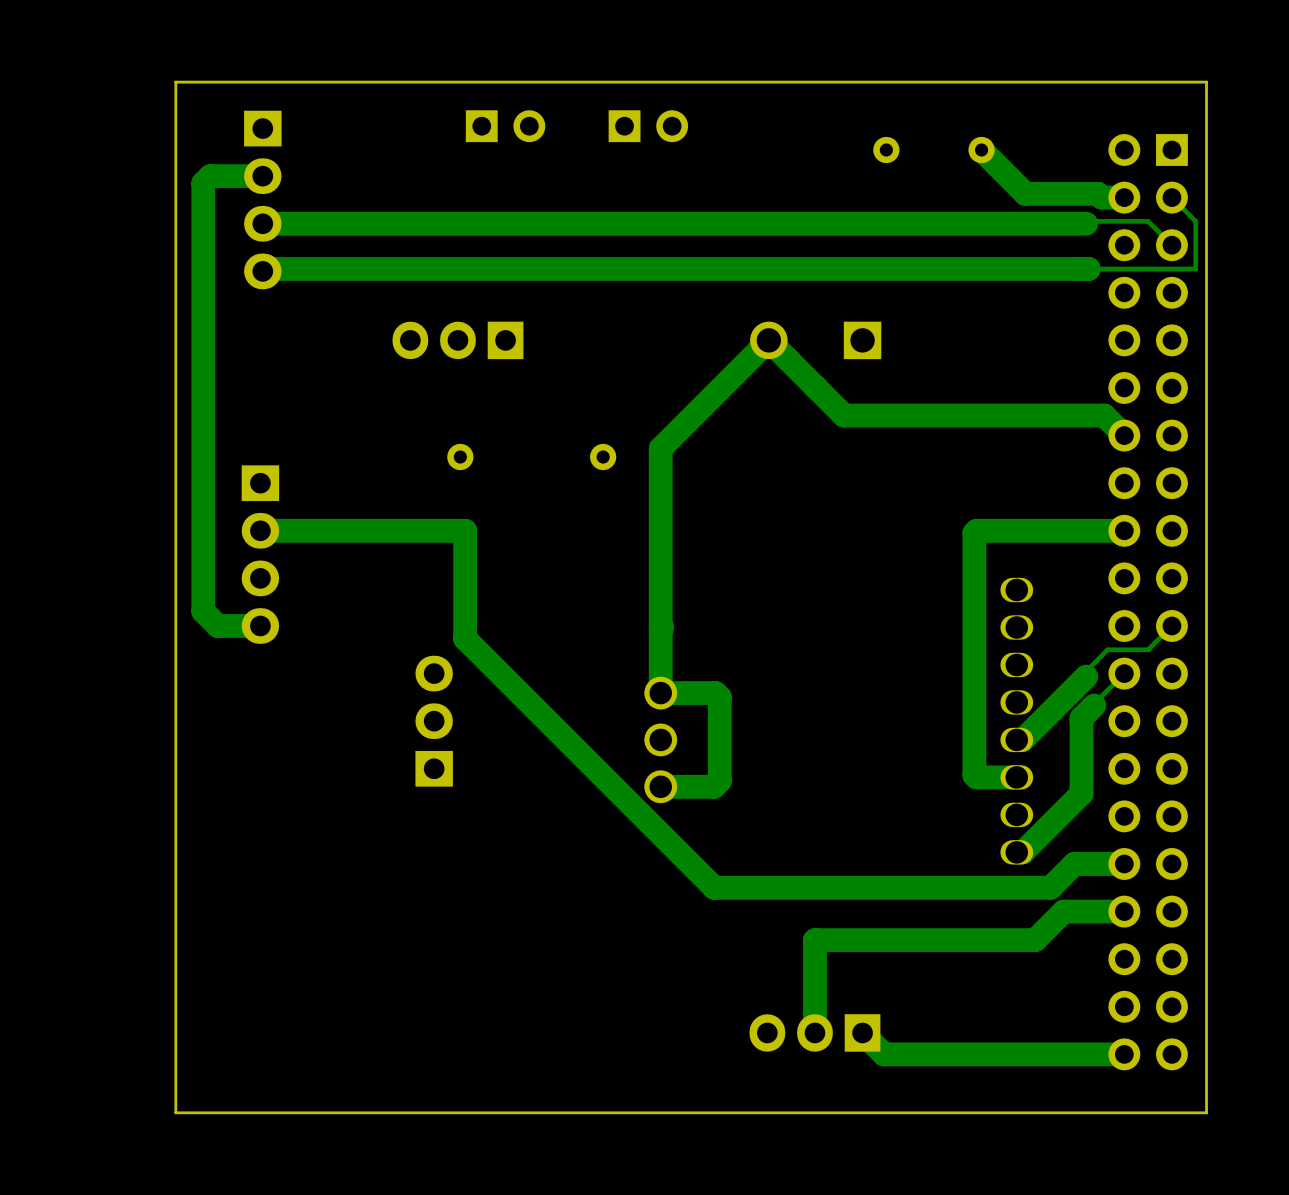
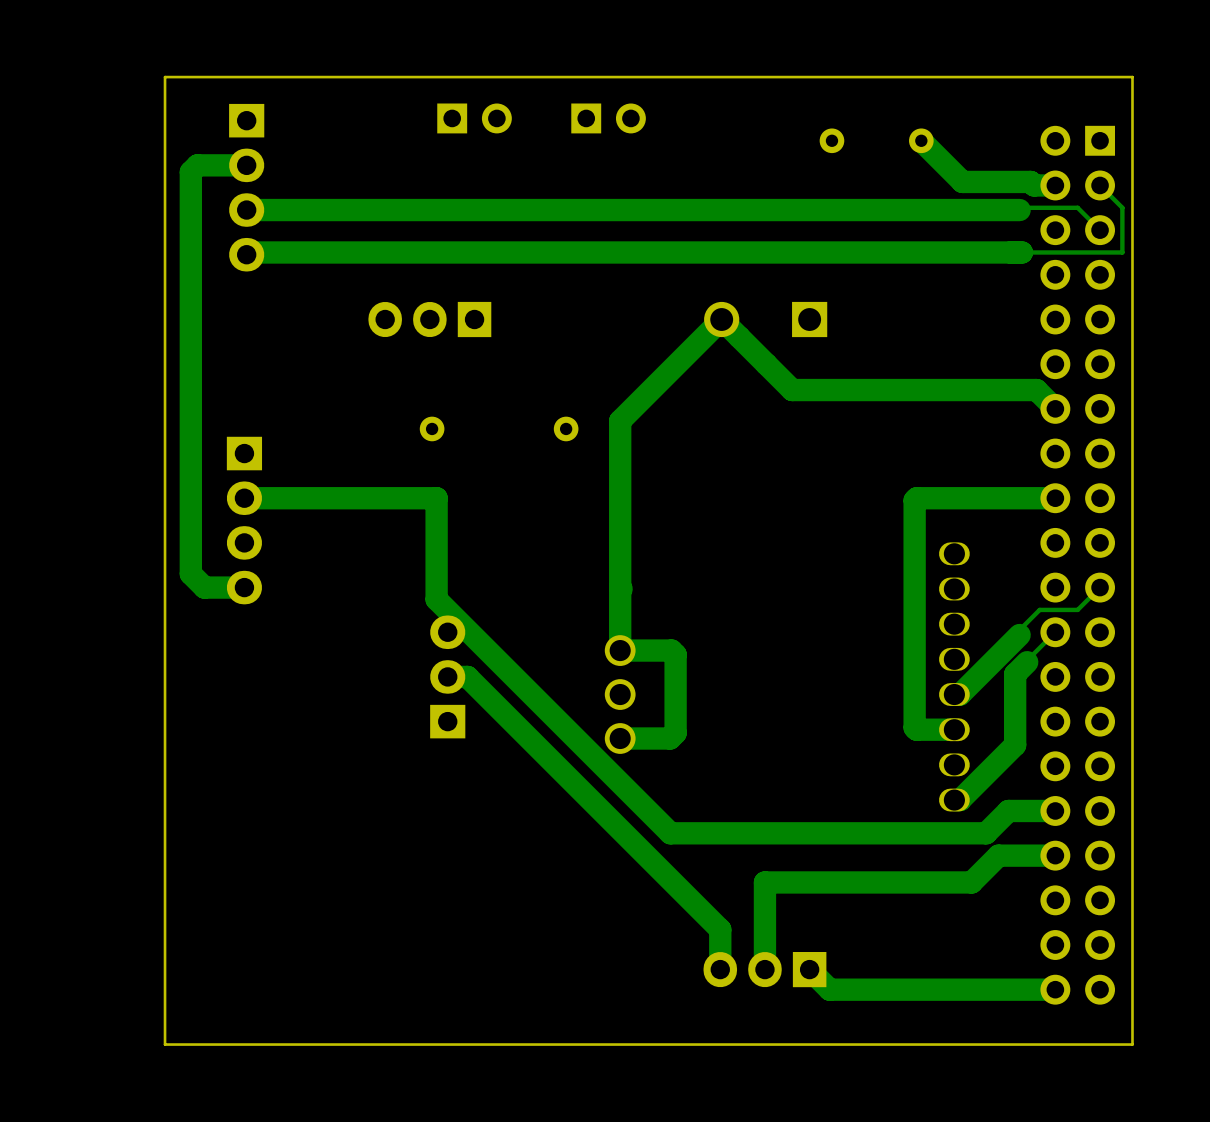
part position: (434, 721) -> (447, 676)
track: none -> (447, 676) (467, 676) (720, 929) (720, 969)

